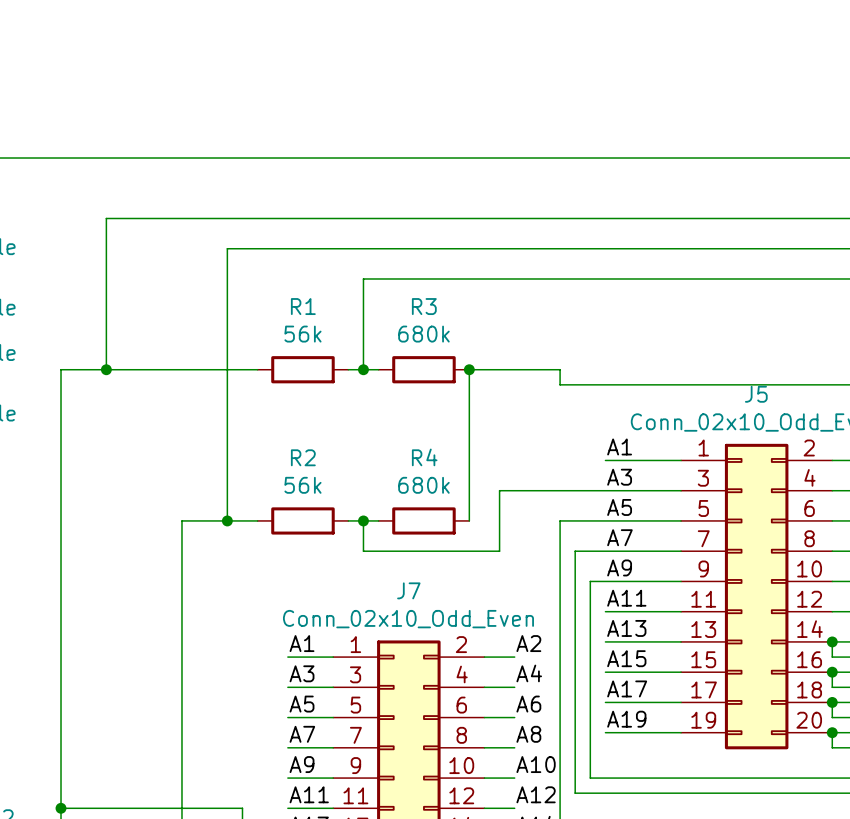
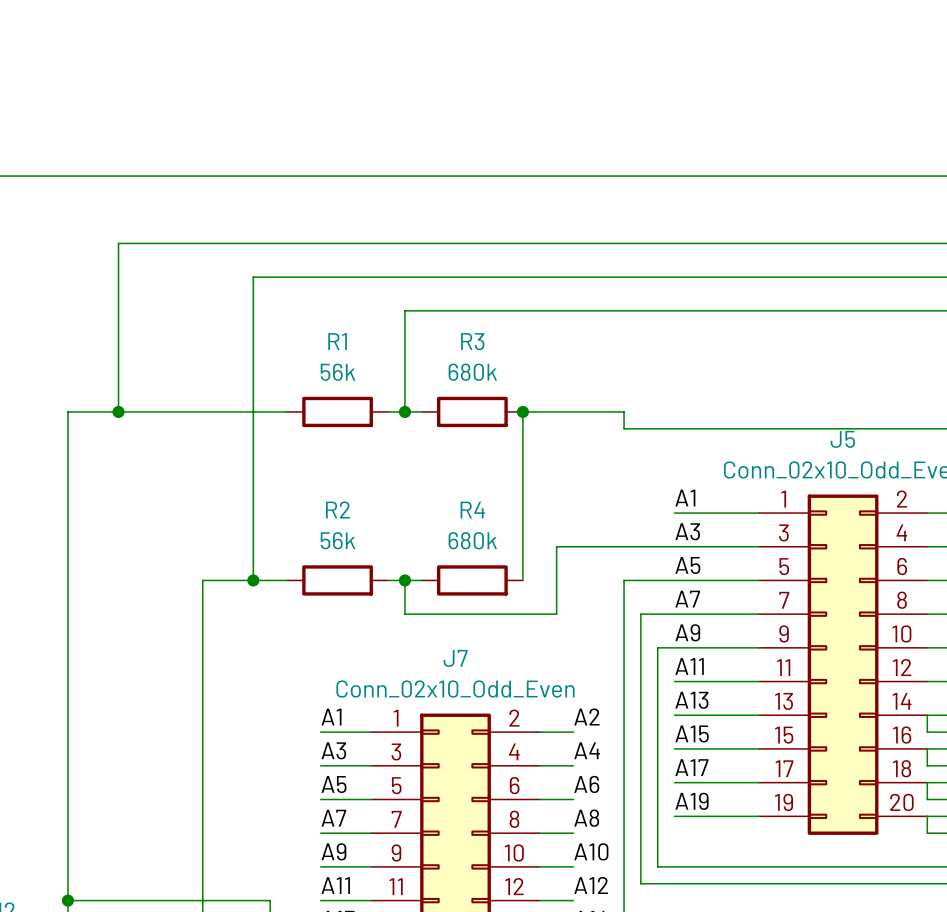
junction: (832, 641) -> none
junction: (832, 672) -> none
junction: (832, 702) -> none
junction: (832, 732) -> none

